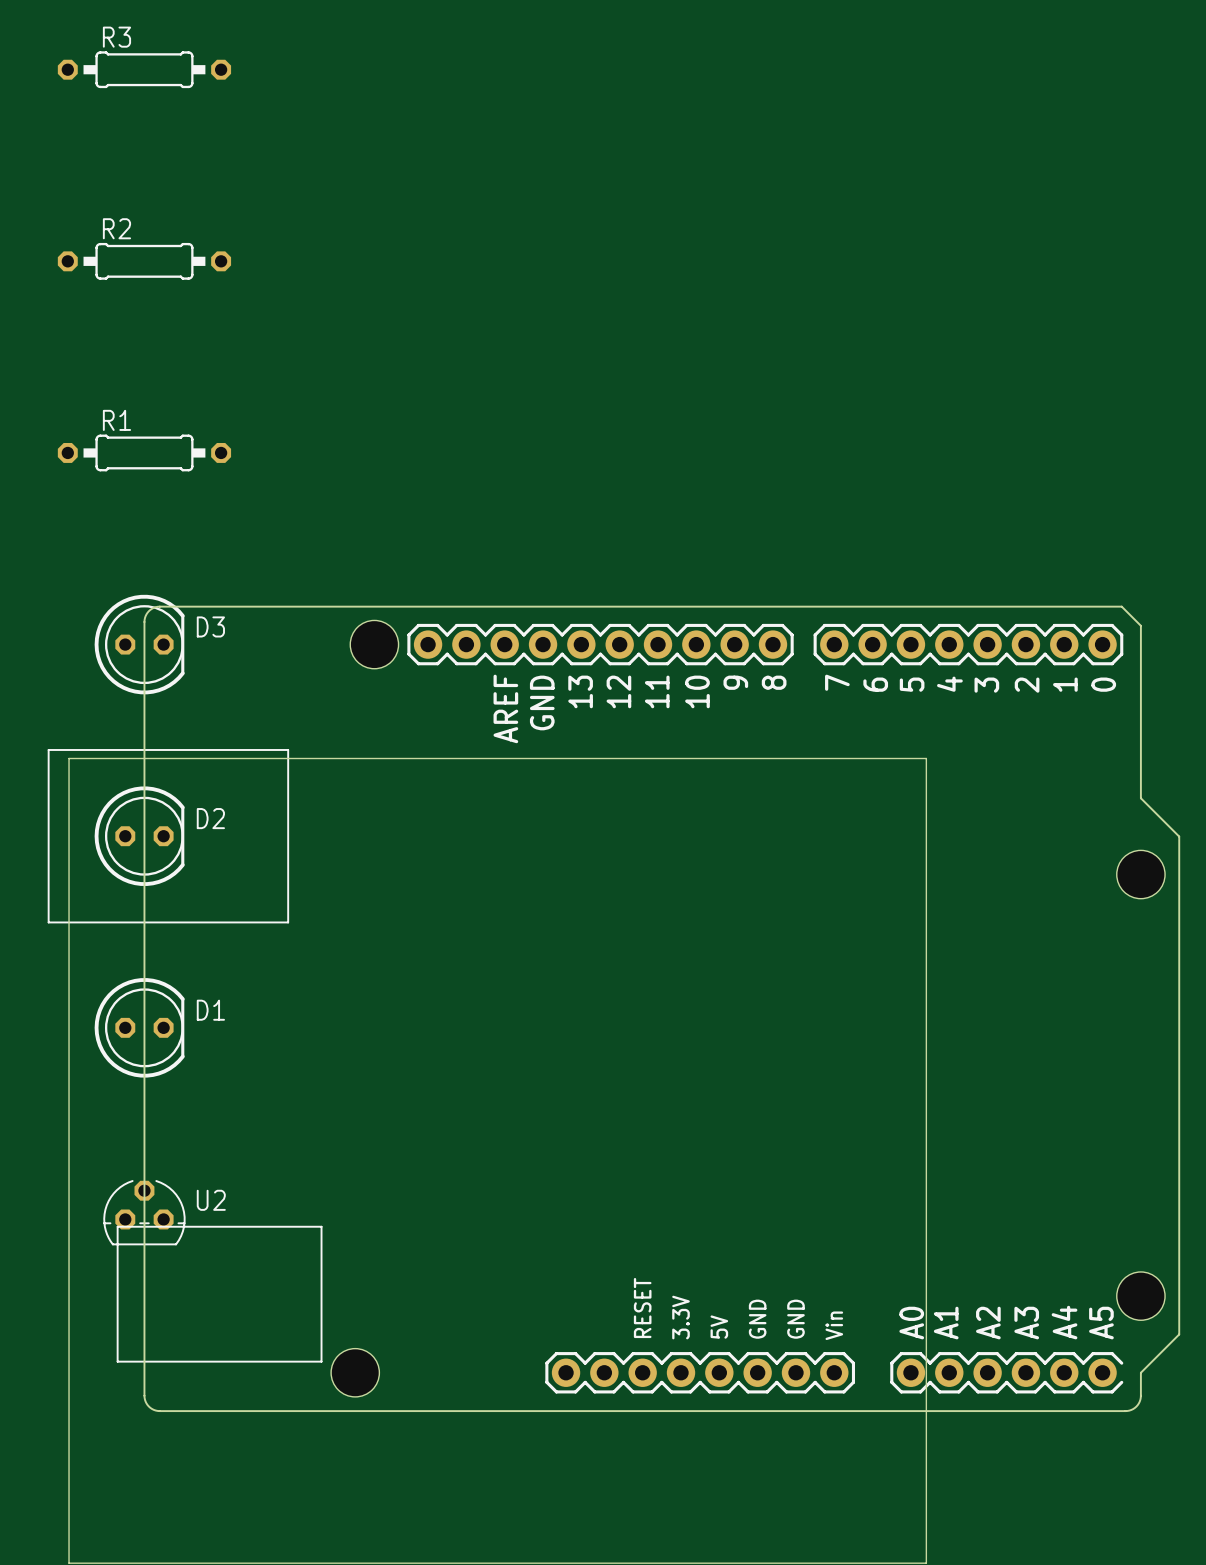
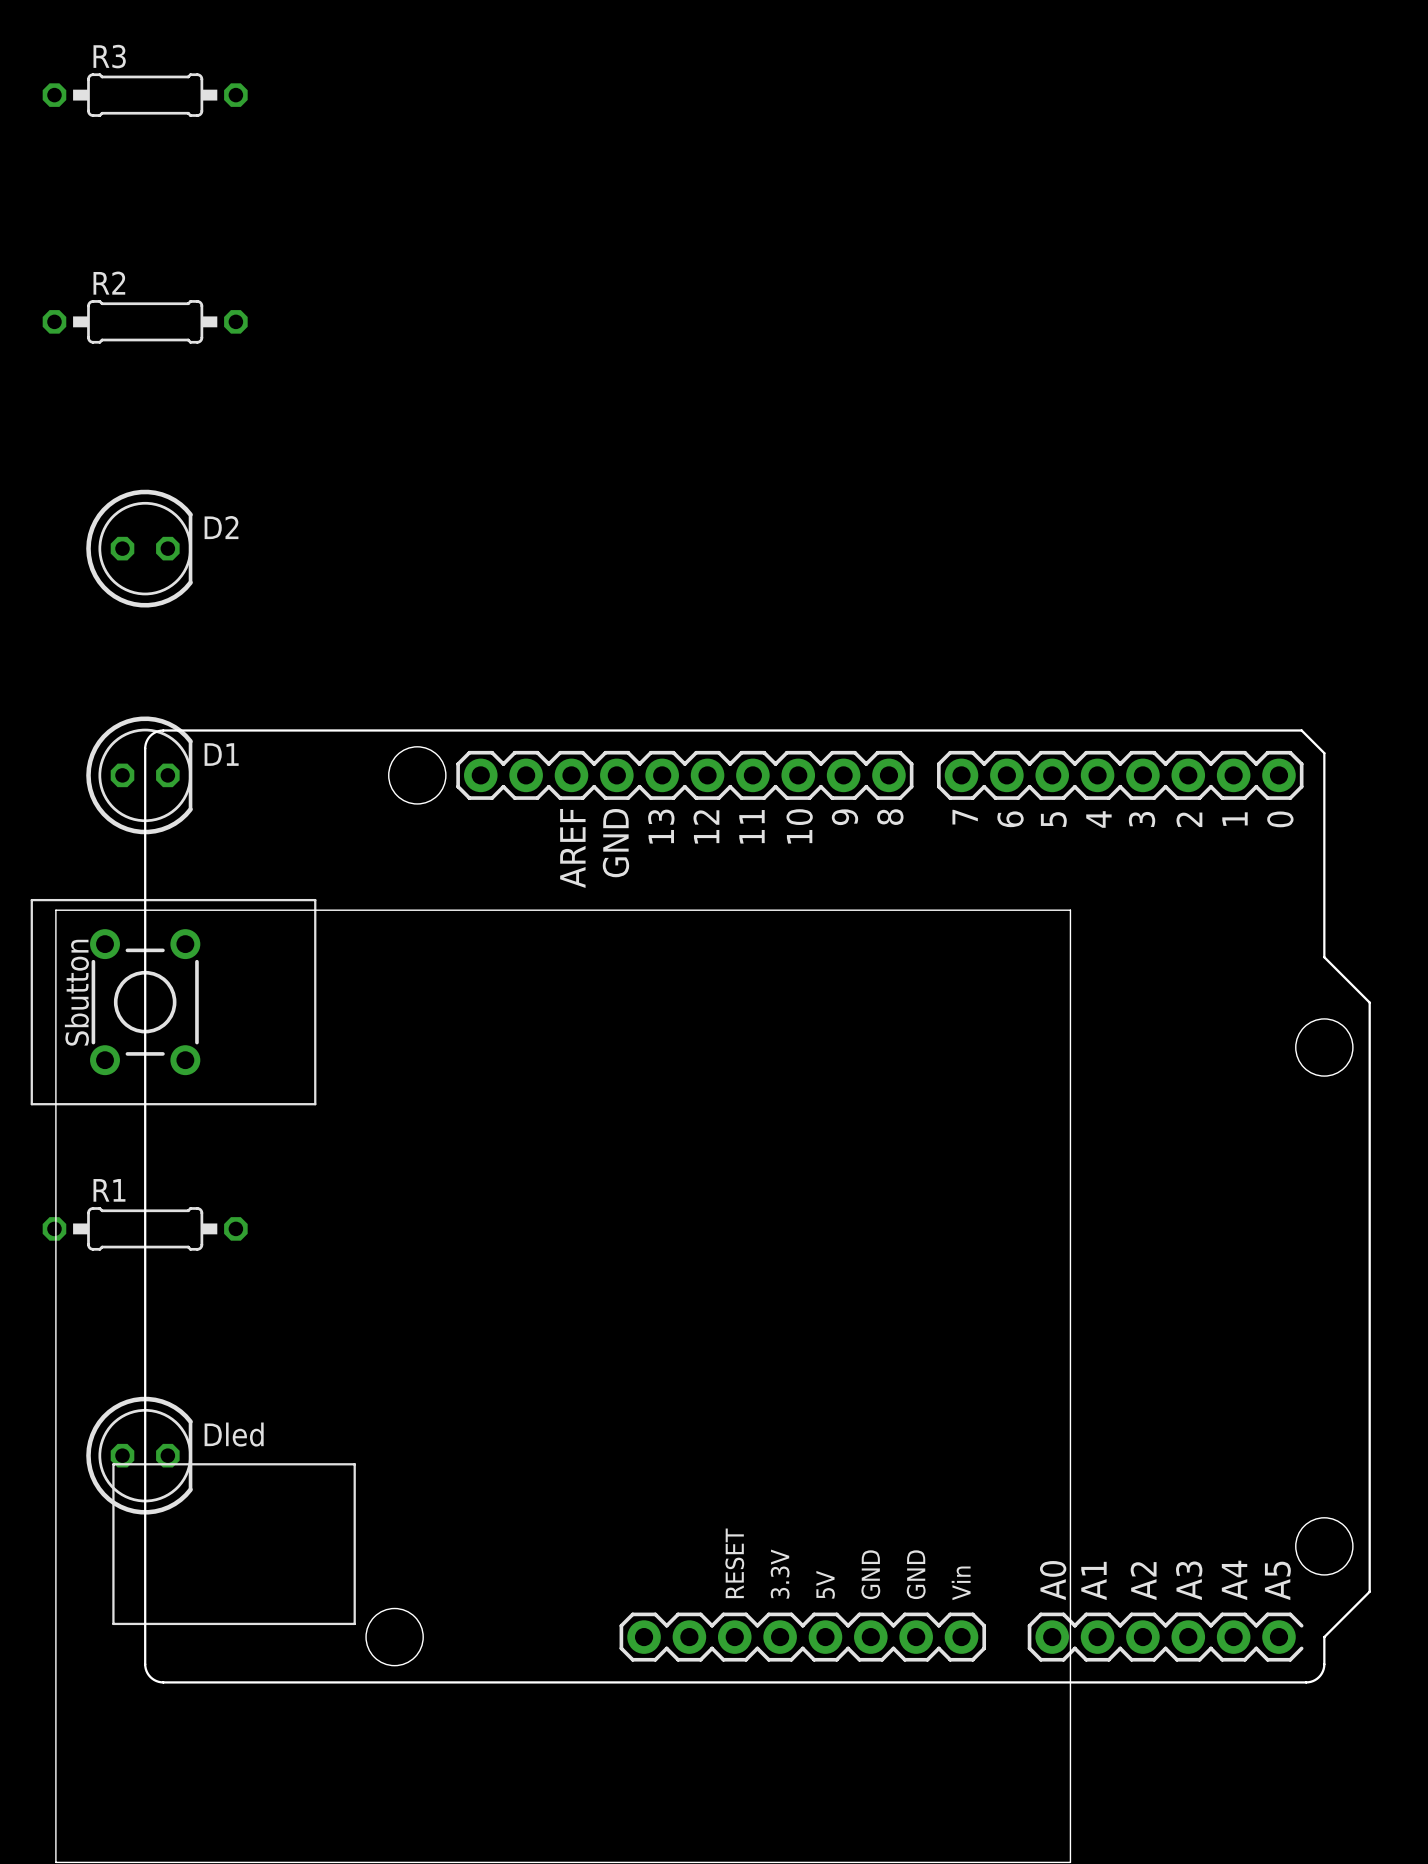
R1 position: (144, 452) -> (145, 1228)
D3 name: D3 (210, 626) -> D1 (221, 754)
D2 position: (139, 836) -> (139, 548)
Sbutton: none -> (145, 1002)
D1: (139, 1027) -> none
U2: (144, 1212) -> none
Dled: none -> (139, 1455)

